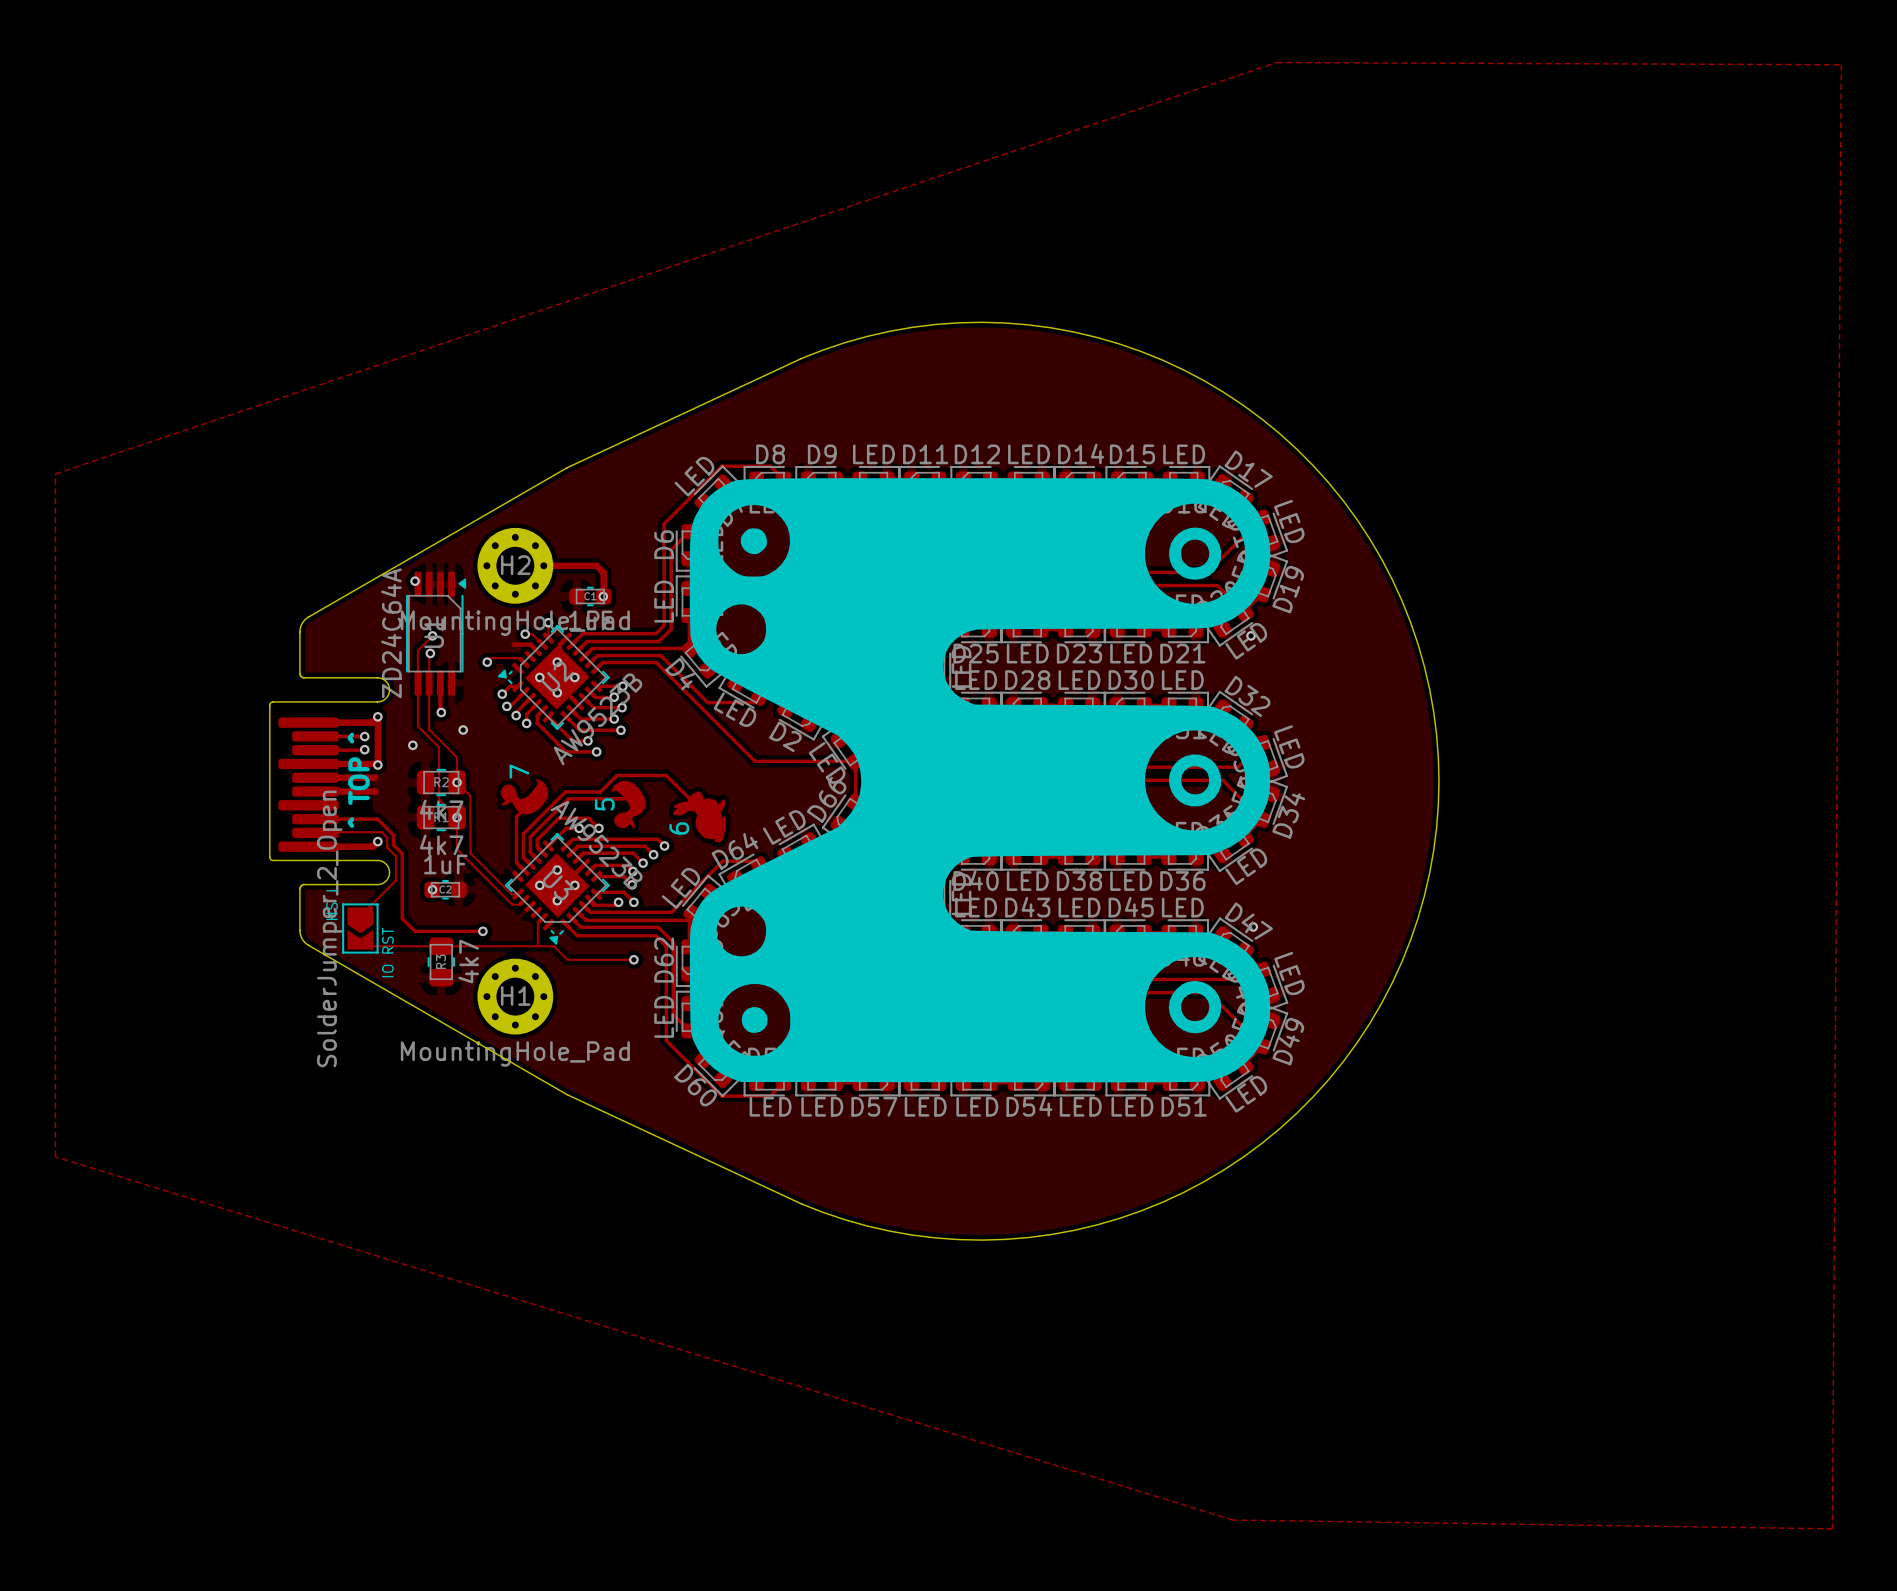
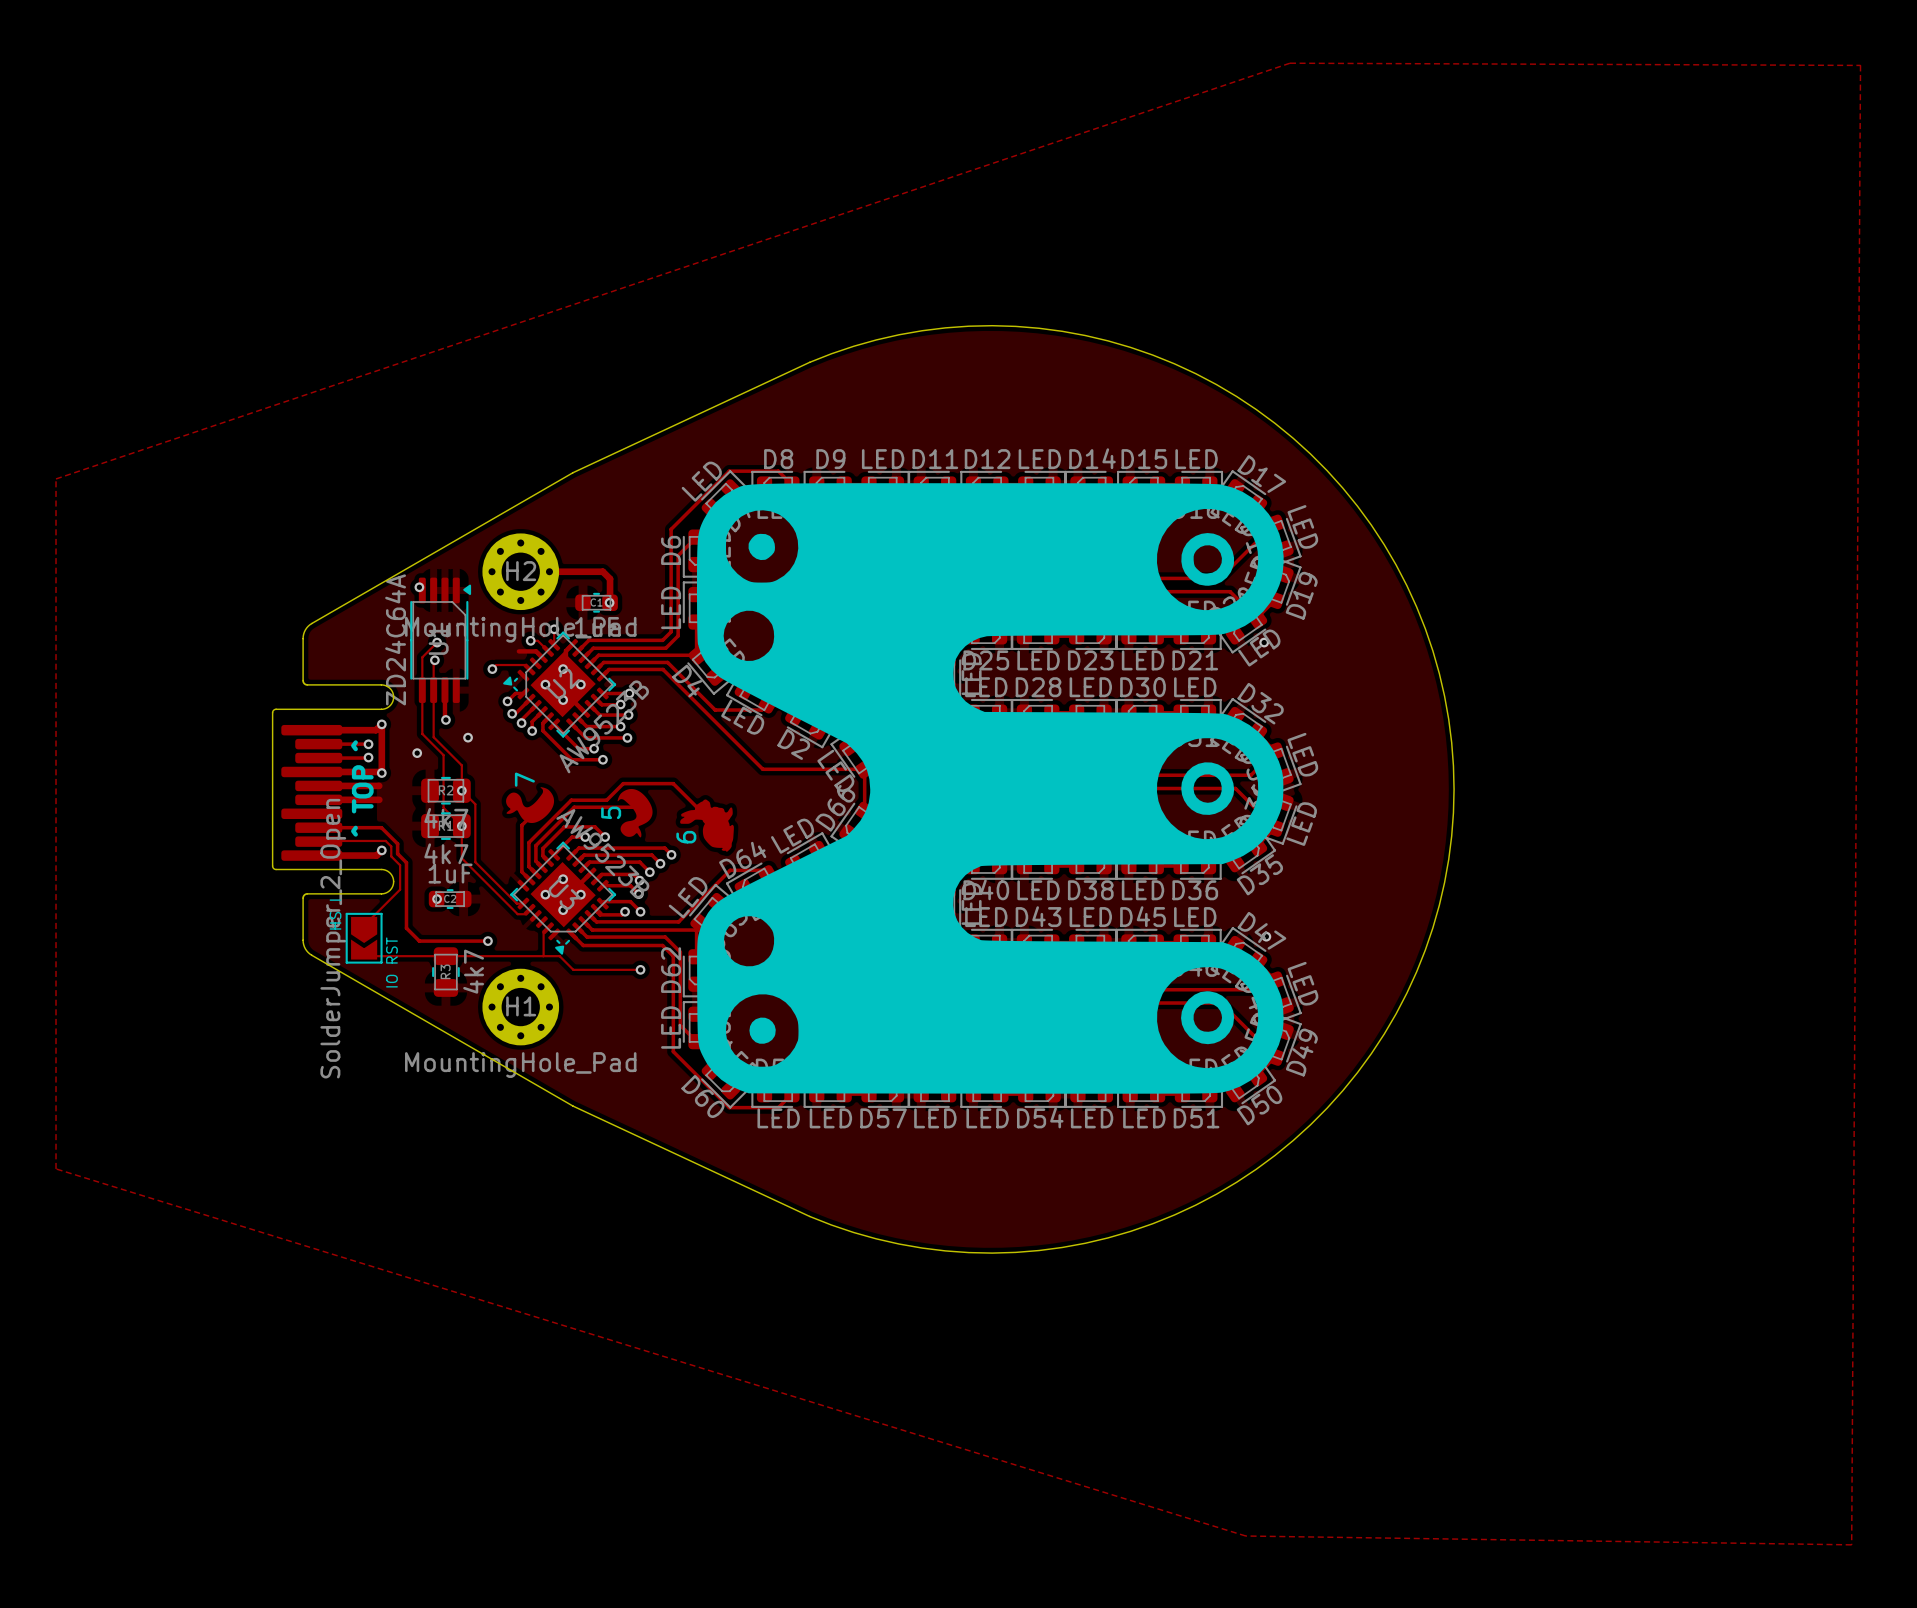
D34 rotation: 0° (1268, 802) -> 180° (1277, 819)
D35 rotation: 0° (1229, 849) -> 180° (1250, 851)
D50 rotation: 0° (1229, 1076) -> 180° (1250, 1081)

